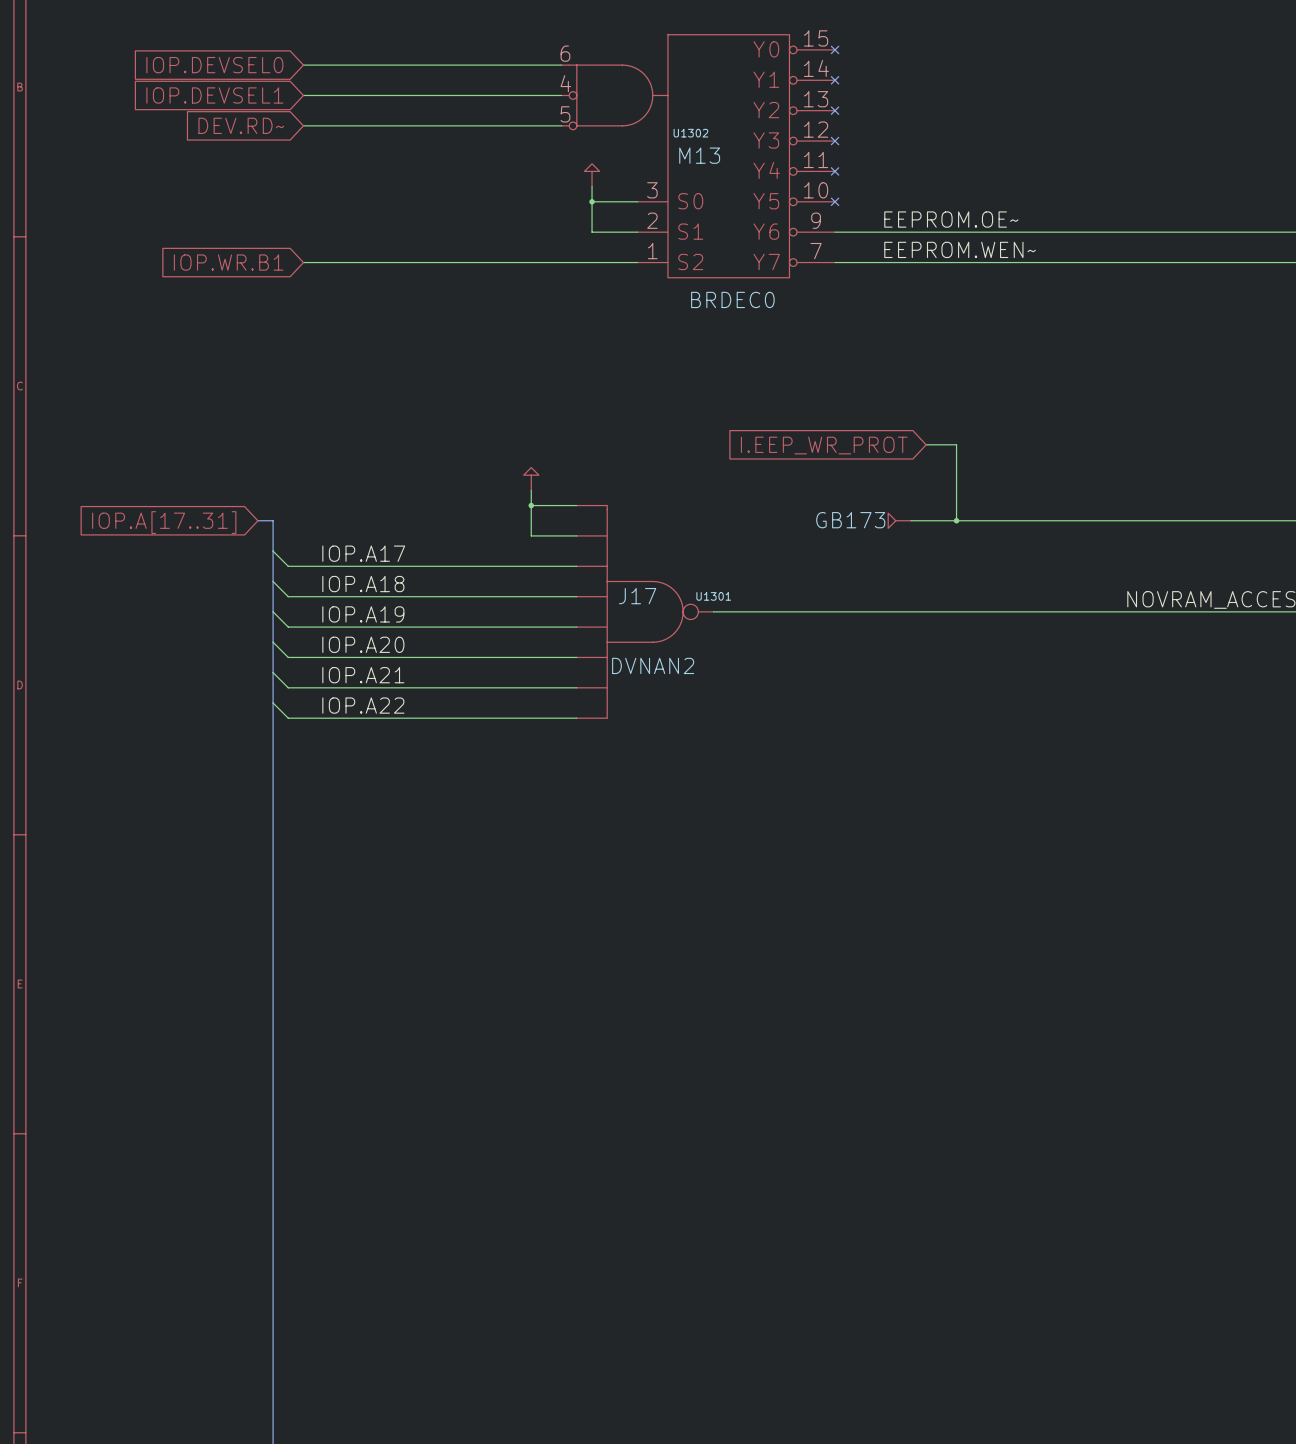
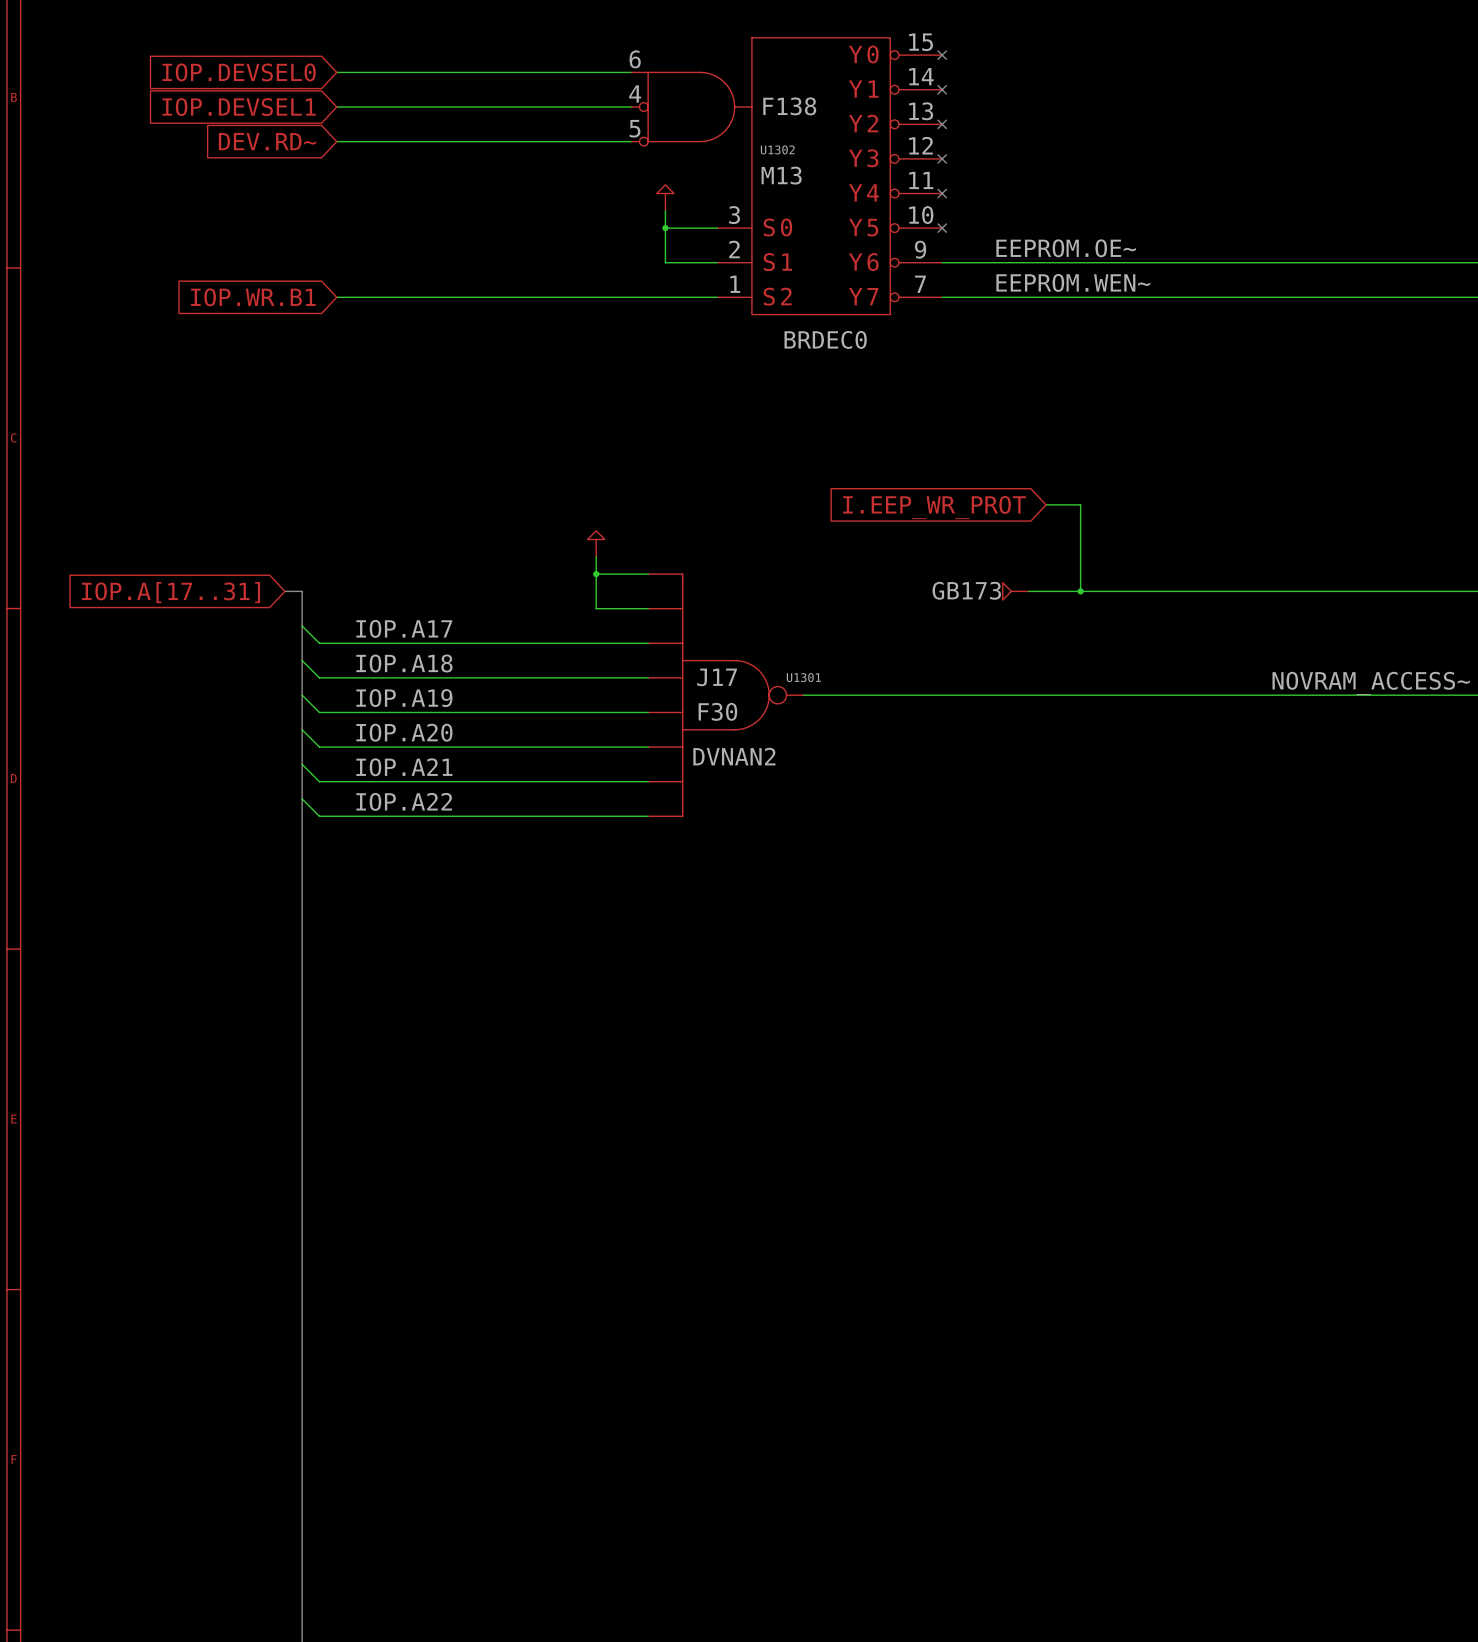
U1302 value: none -> F138 (789, 106)
U1301 value: none -> F30 (717, 711)

